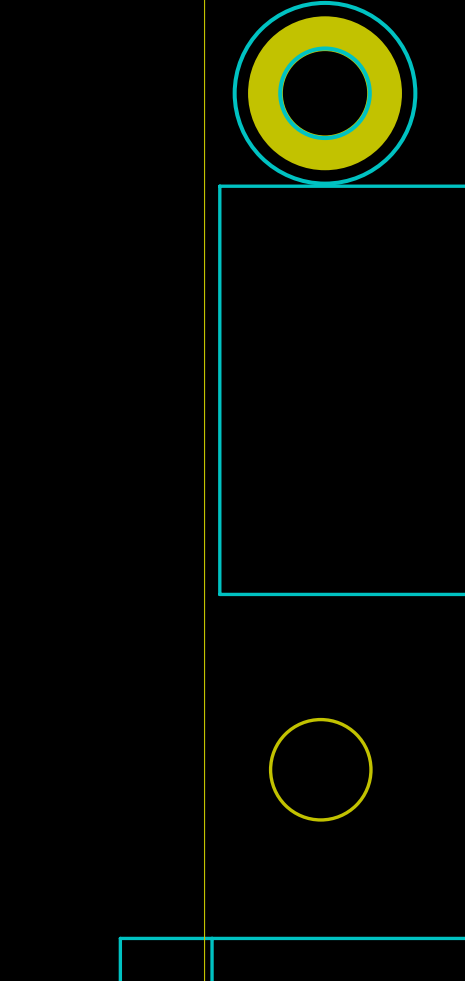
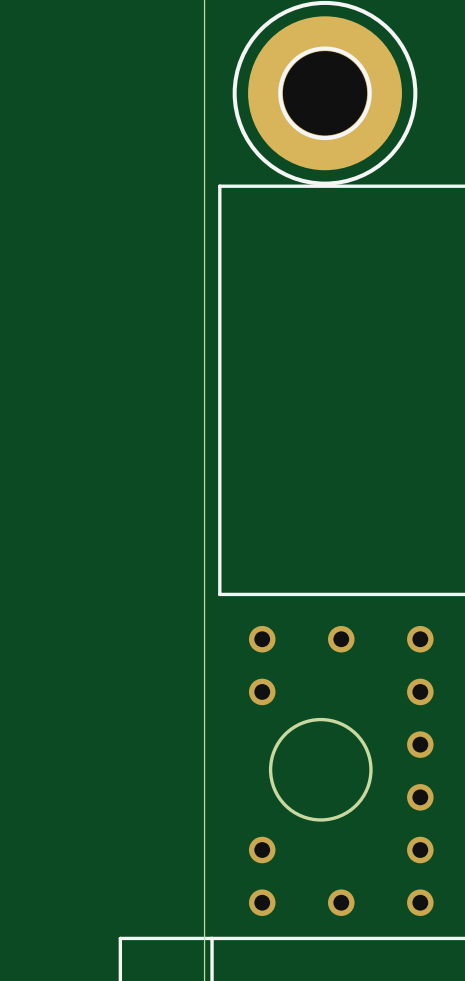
via: none -> (262, 639)
via: none -> (341, 639)
via: none -> (420, 639)
via: none -> (262, 691)
via: none -> (420, 691)
via: none -> (420, 744)
via: none -> (420, 797)
via: none -> (262, 850)
via: none -> (420, 850)
via: none -> (262, 902)
via: none -> (341, 902)
via: none -> (420, 902)

